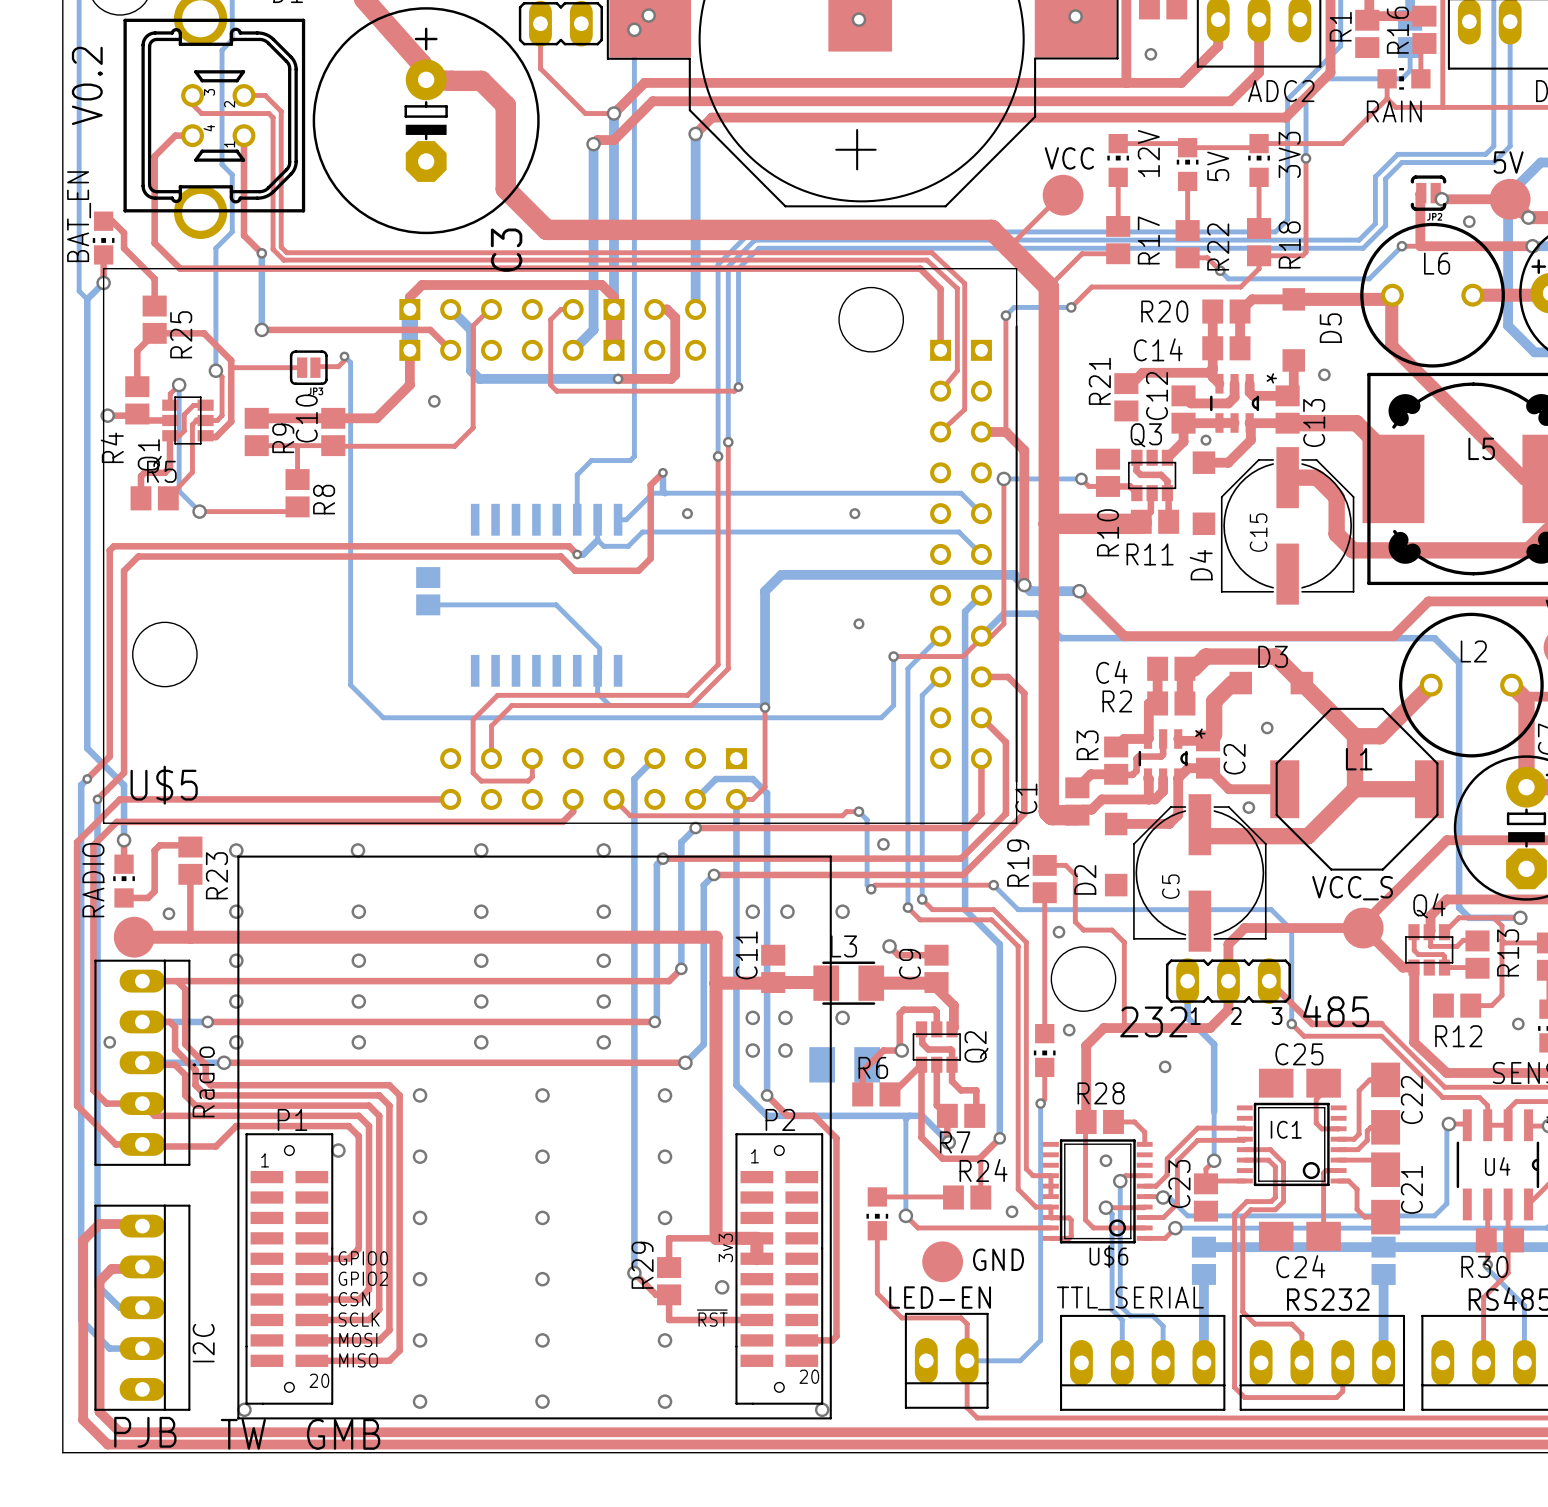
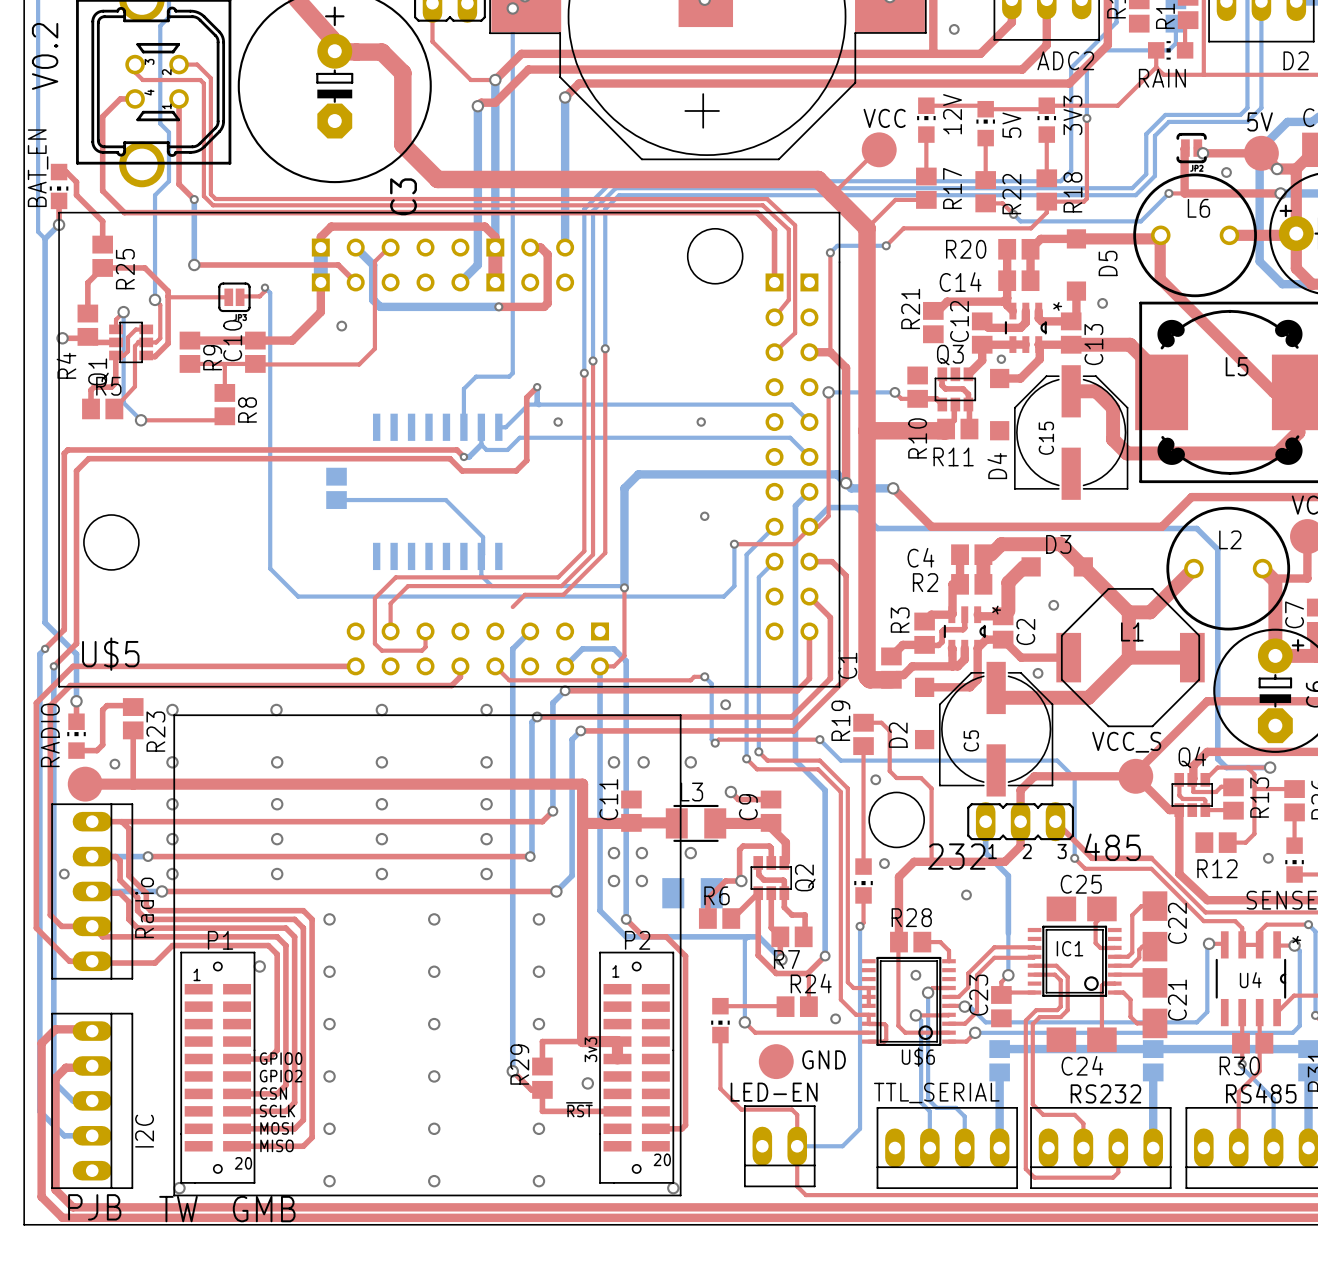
bottom track: (742, 264) (738, 268) (738, 387) -> (605, 209) (605, 348)
top track: (573, 309) (560, 309) (550, 319) (550, 385) (556, 391) (734, 391) (738, 387) -> none
via: (738, 387) -> none
top track: none -> (605, 348) (605, 552) (563, 594) (524, 594) (512, 607)
via: none -> (605, 348)

